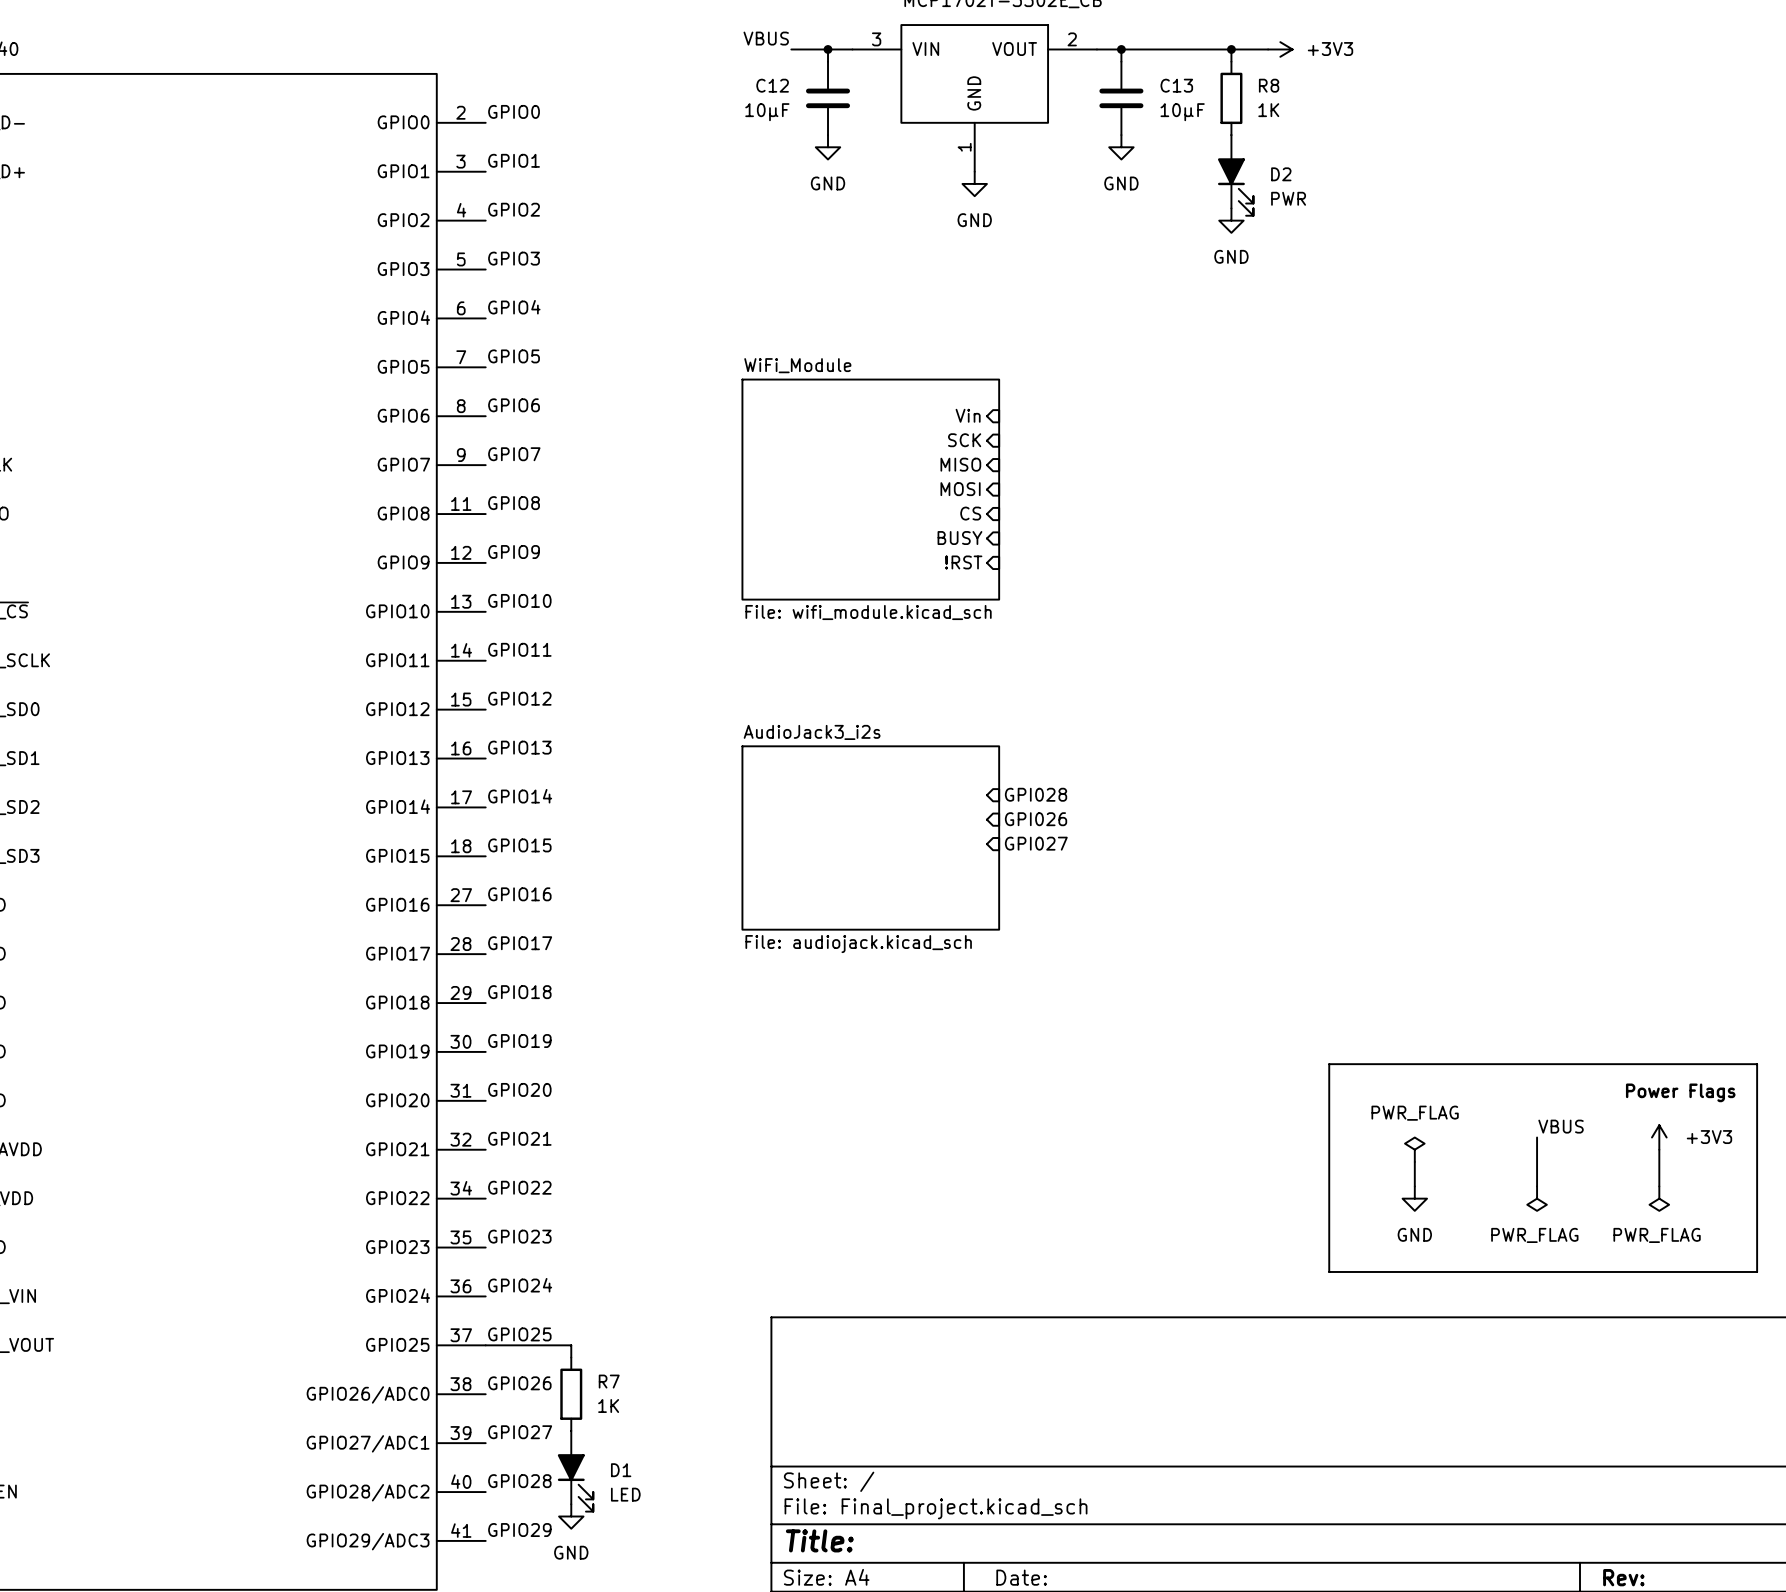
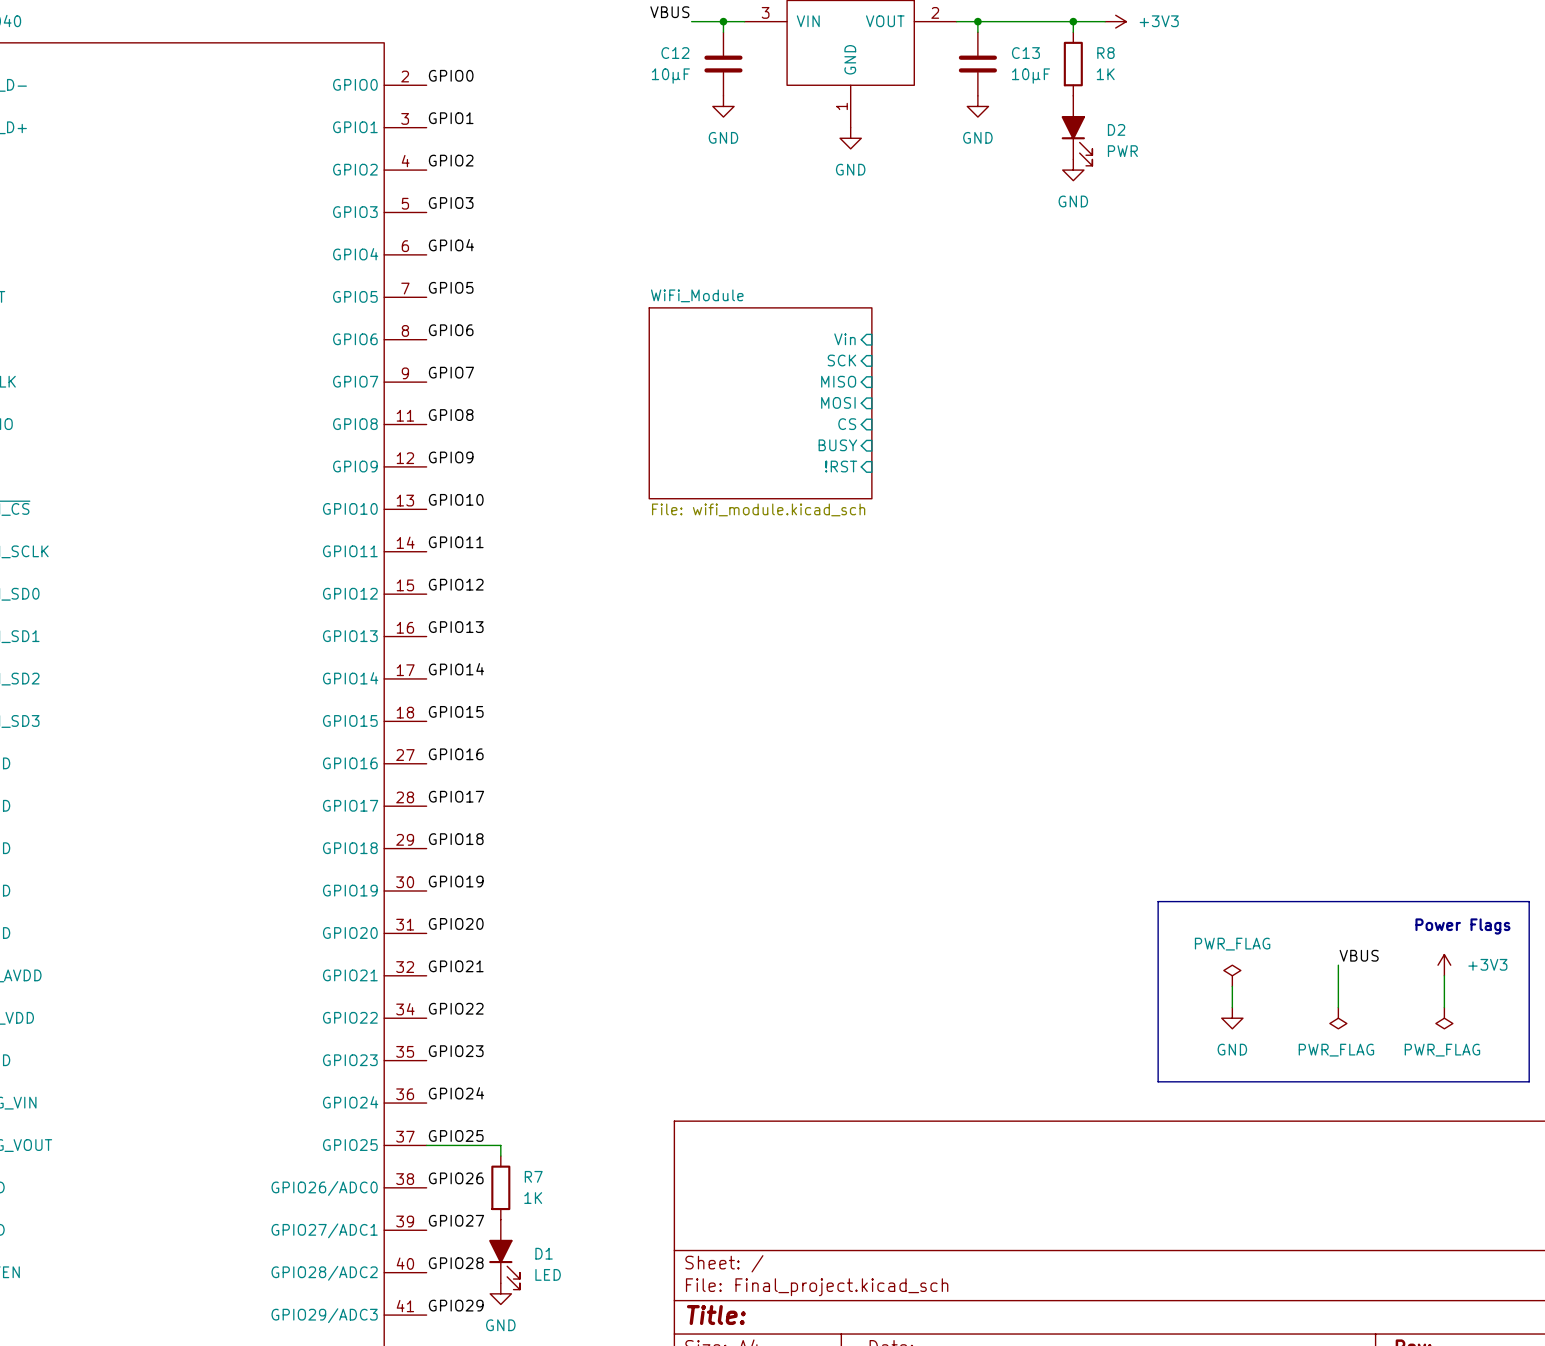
hierarchical label: GPI028 (1036, 794) -> none
hierarchical label: GPI026 (1036, 819) -> none
sheet AudioJack3_i2s: File: audiojack.kicad_sch (870, 838) -> none
hierarchical label: GPI027 (1036, 843) -> none

